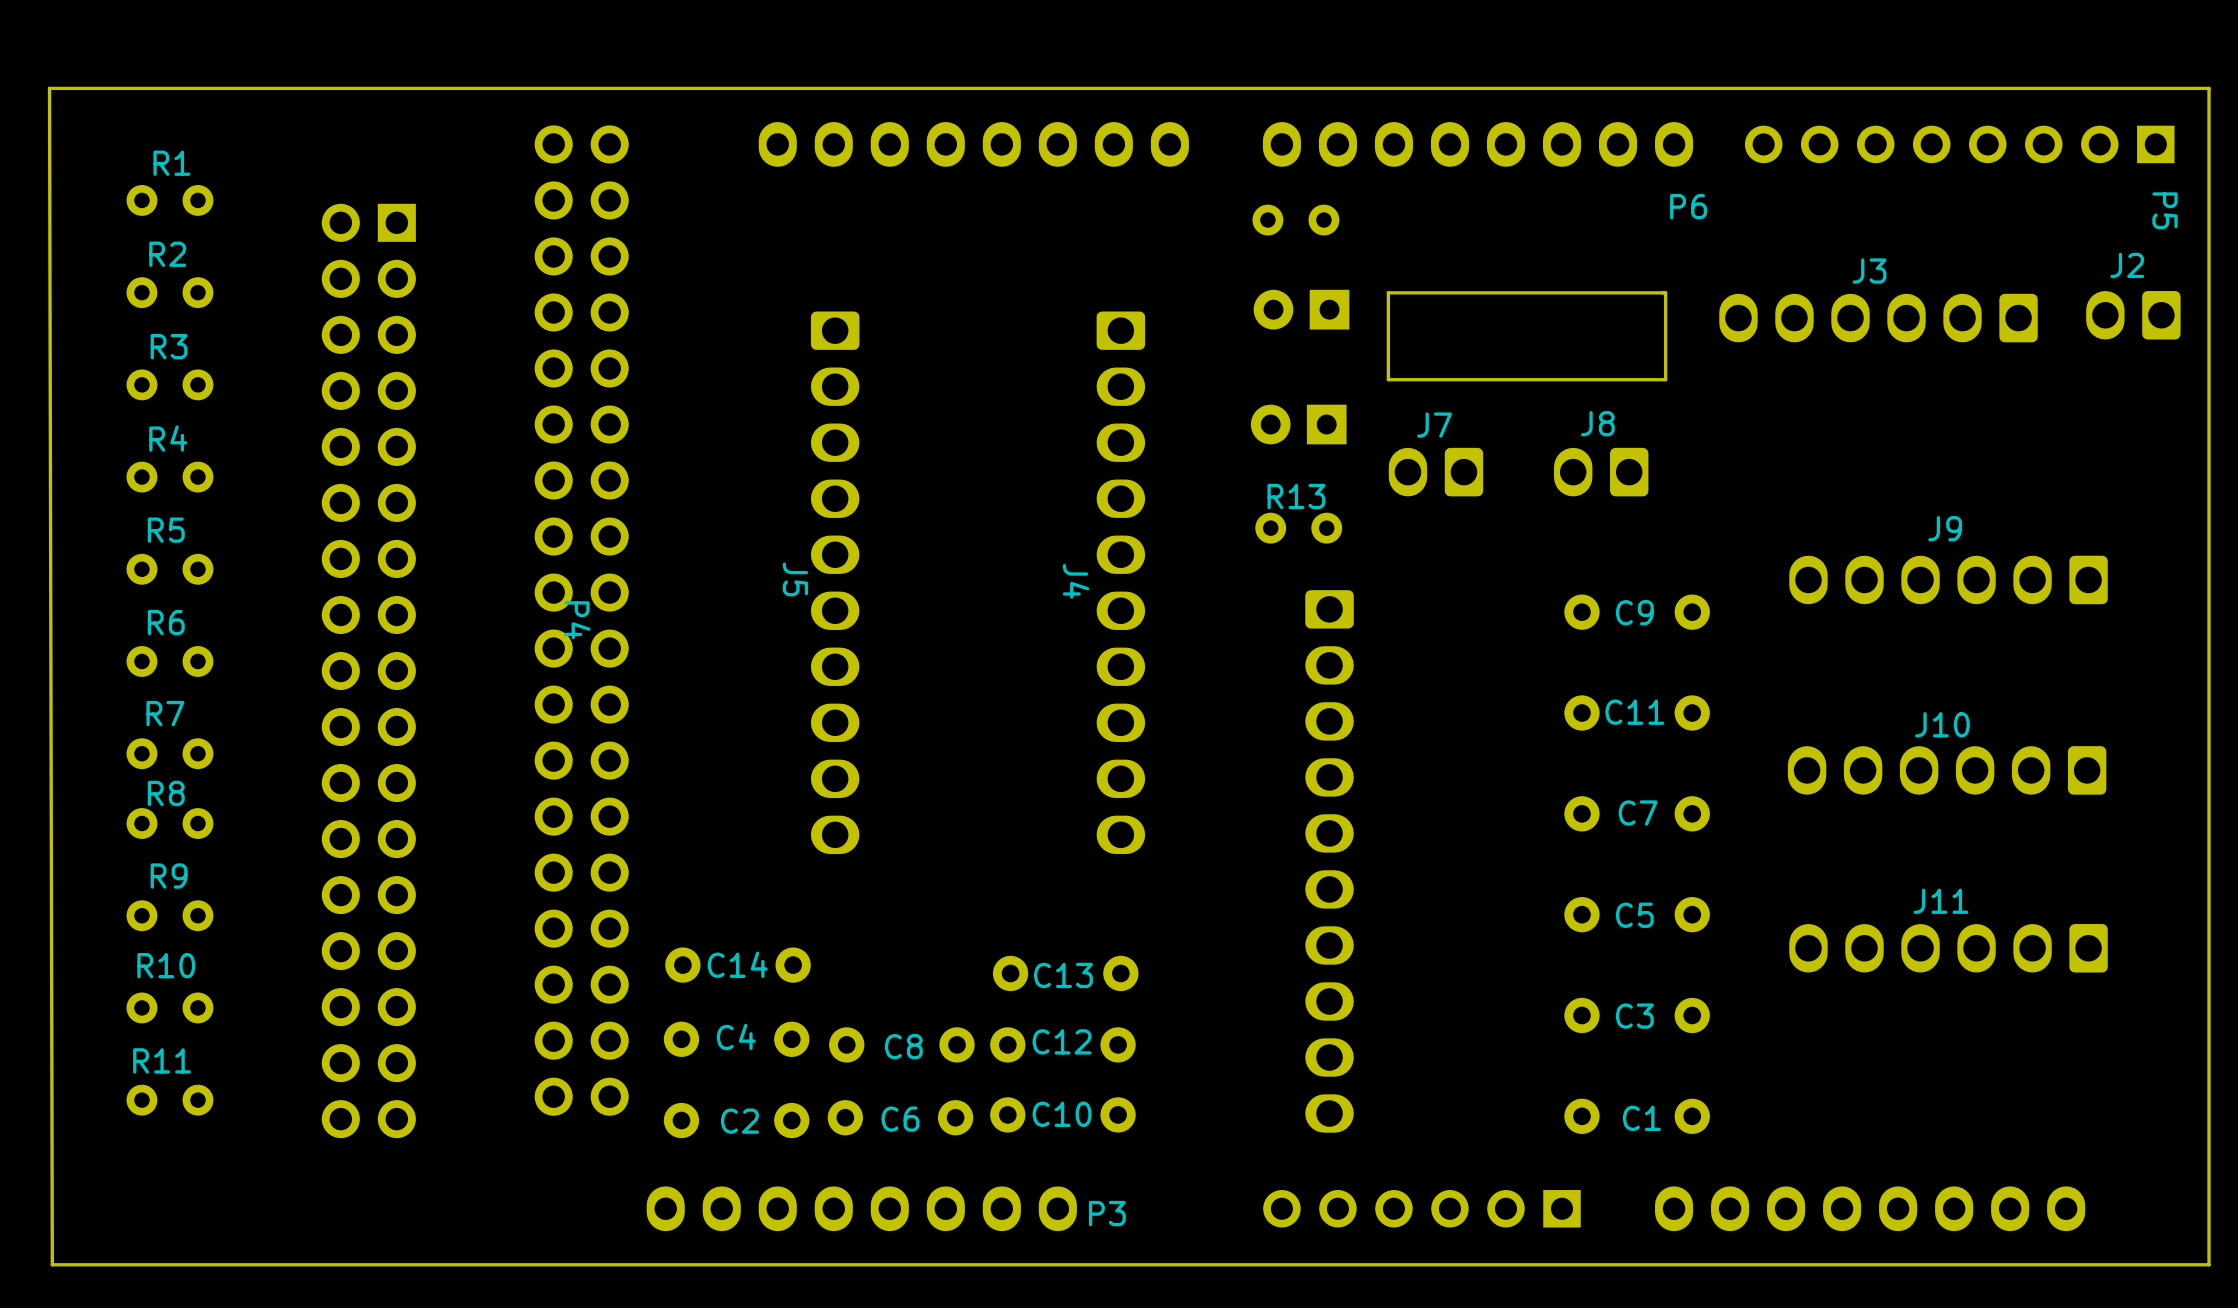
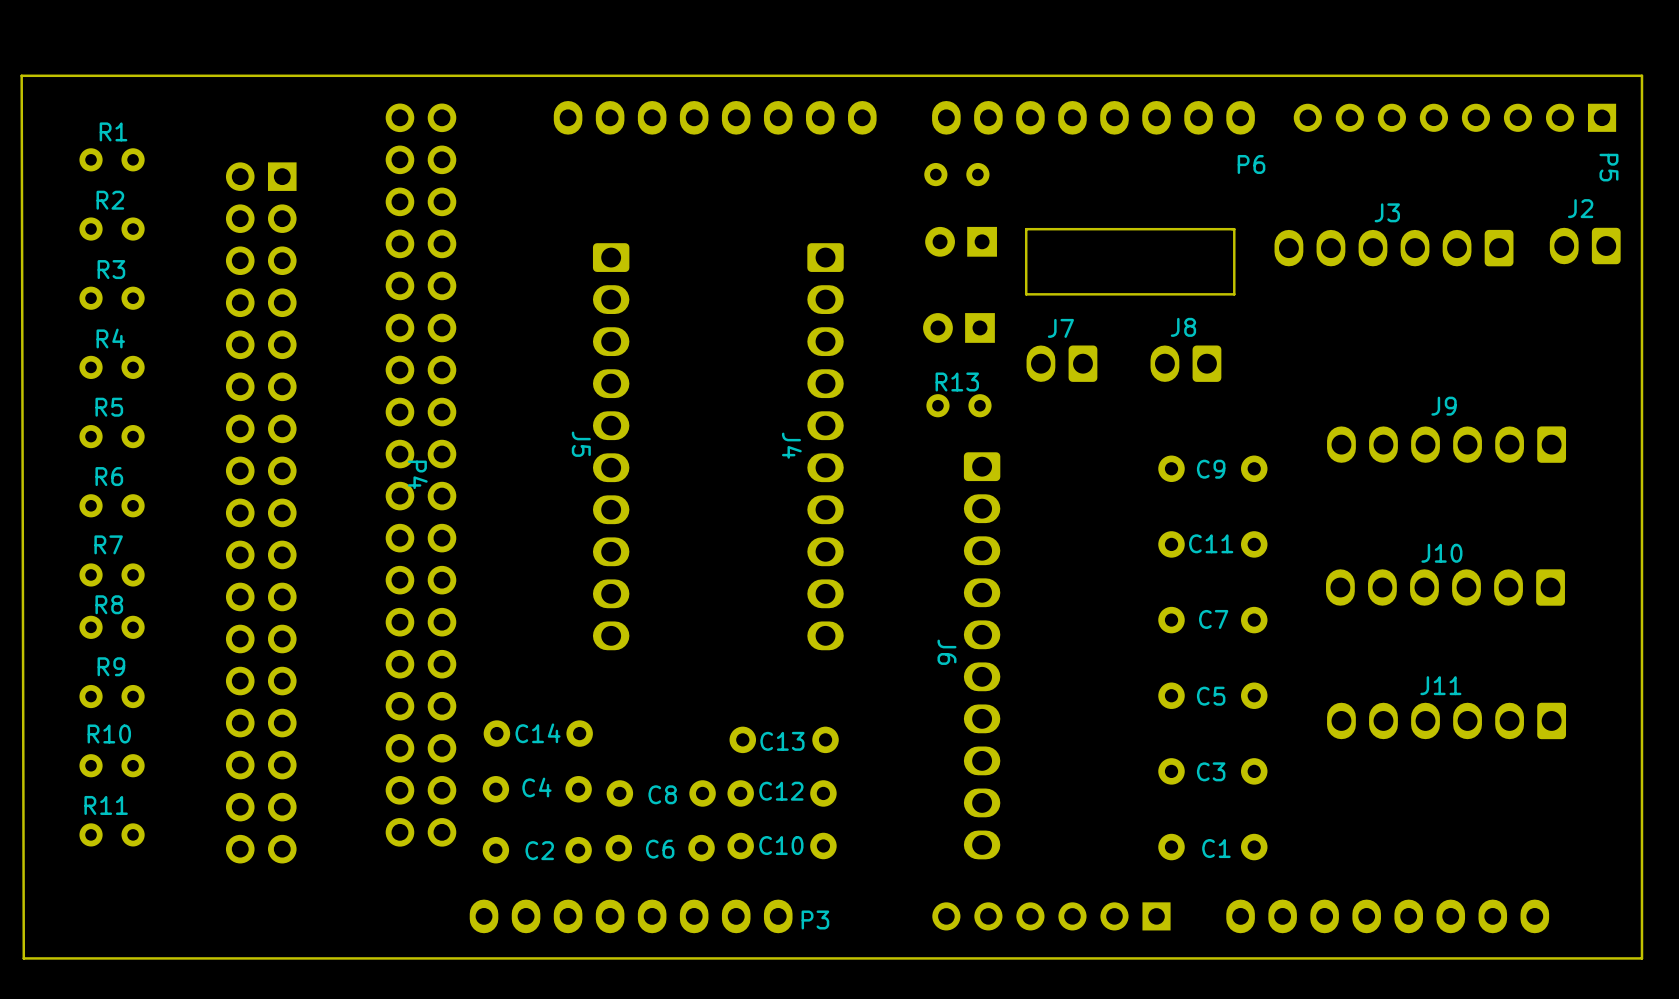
J6 name: none -> J6 (946, 652)

